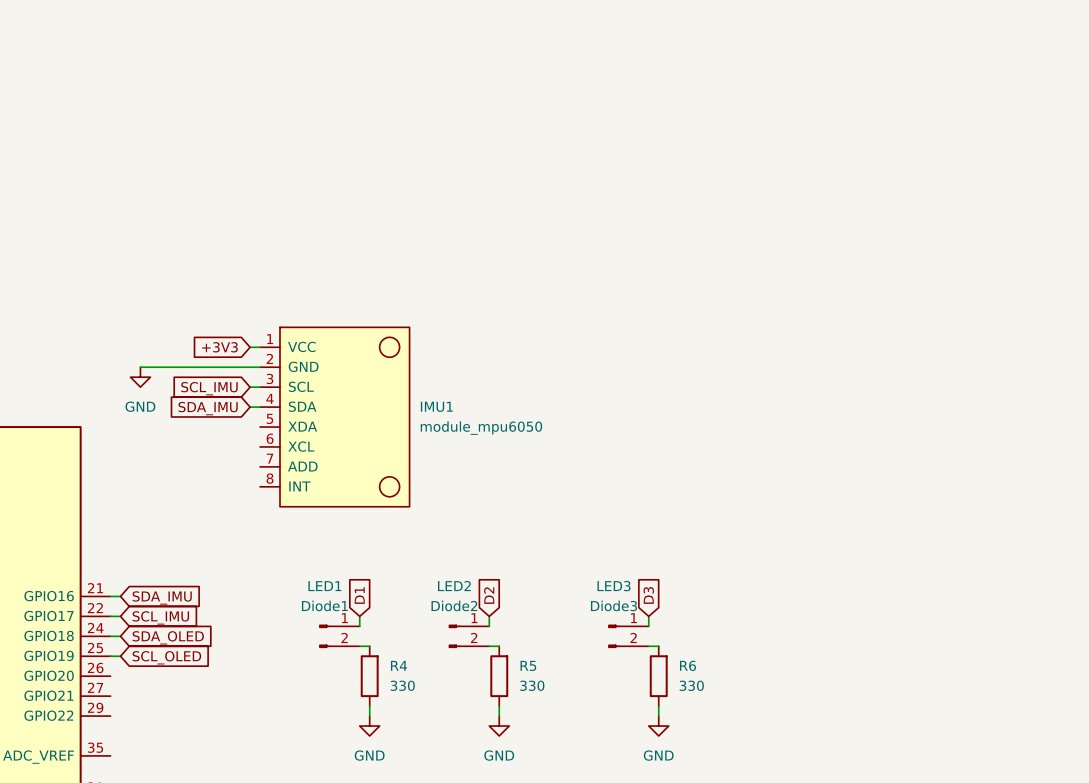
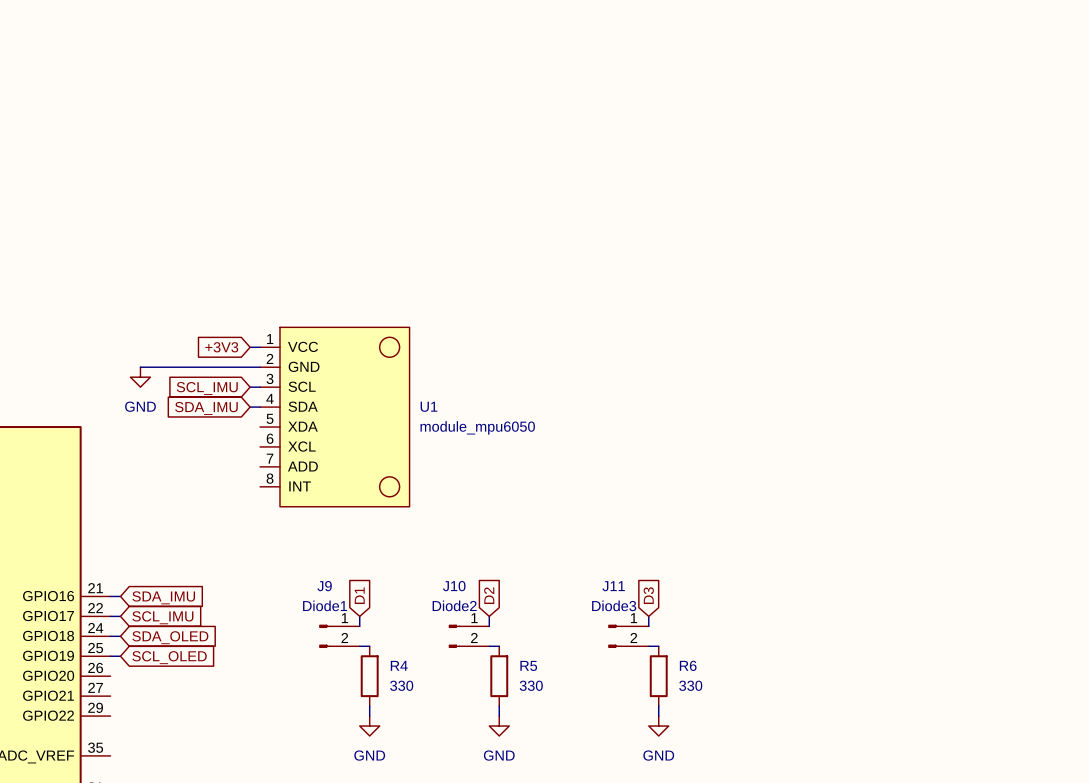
IMU1 name: IMU1 (436, 406) -> U1 (428, 406)
LED1 name: LED1 (324, 586) -> J9 (324, 586)
LED2 name: LED2 (454, 586) -> J10 (454, 586)
LED3 name: LED3 (614, 586) -> J11 (613, 586)

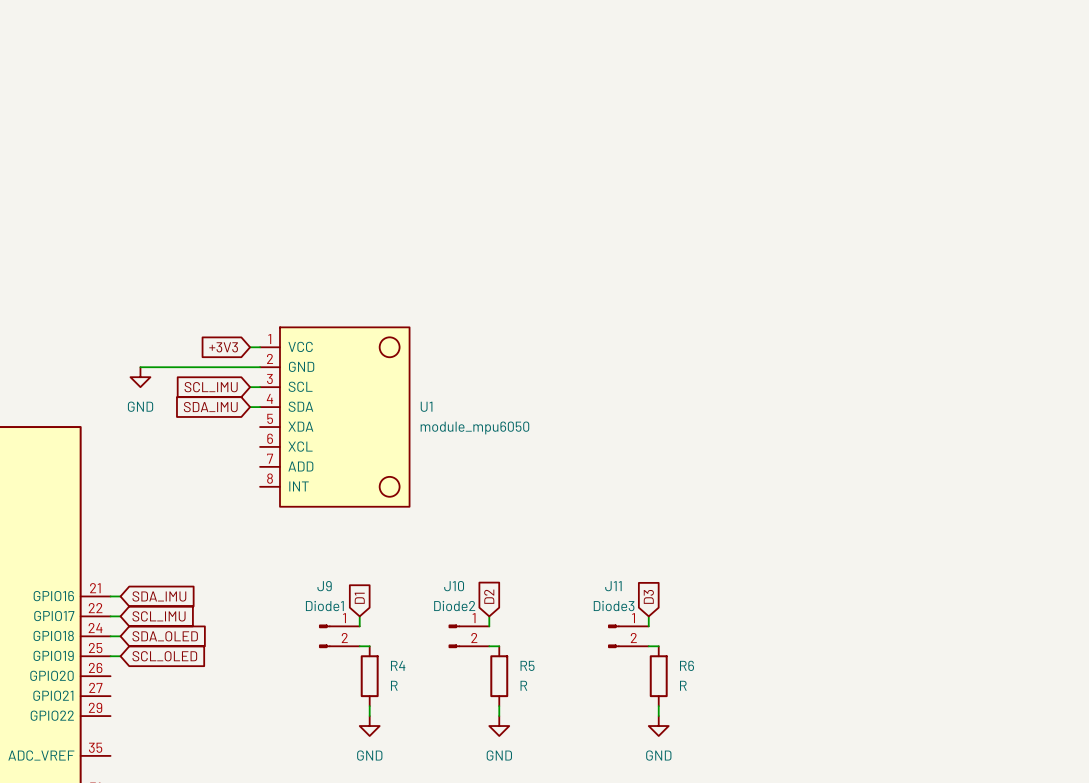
R4 value: 330 (401, 685) -> R (394, 685)
R5 value: 330 (531, 685) -> R (523, 685)
R6 value: 330 (690, 685) -> R (683, 685)

